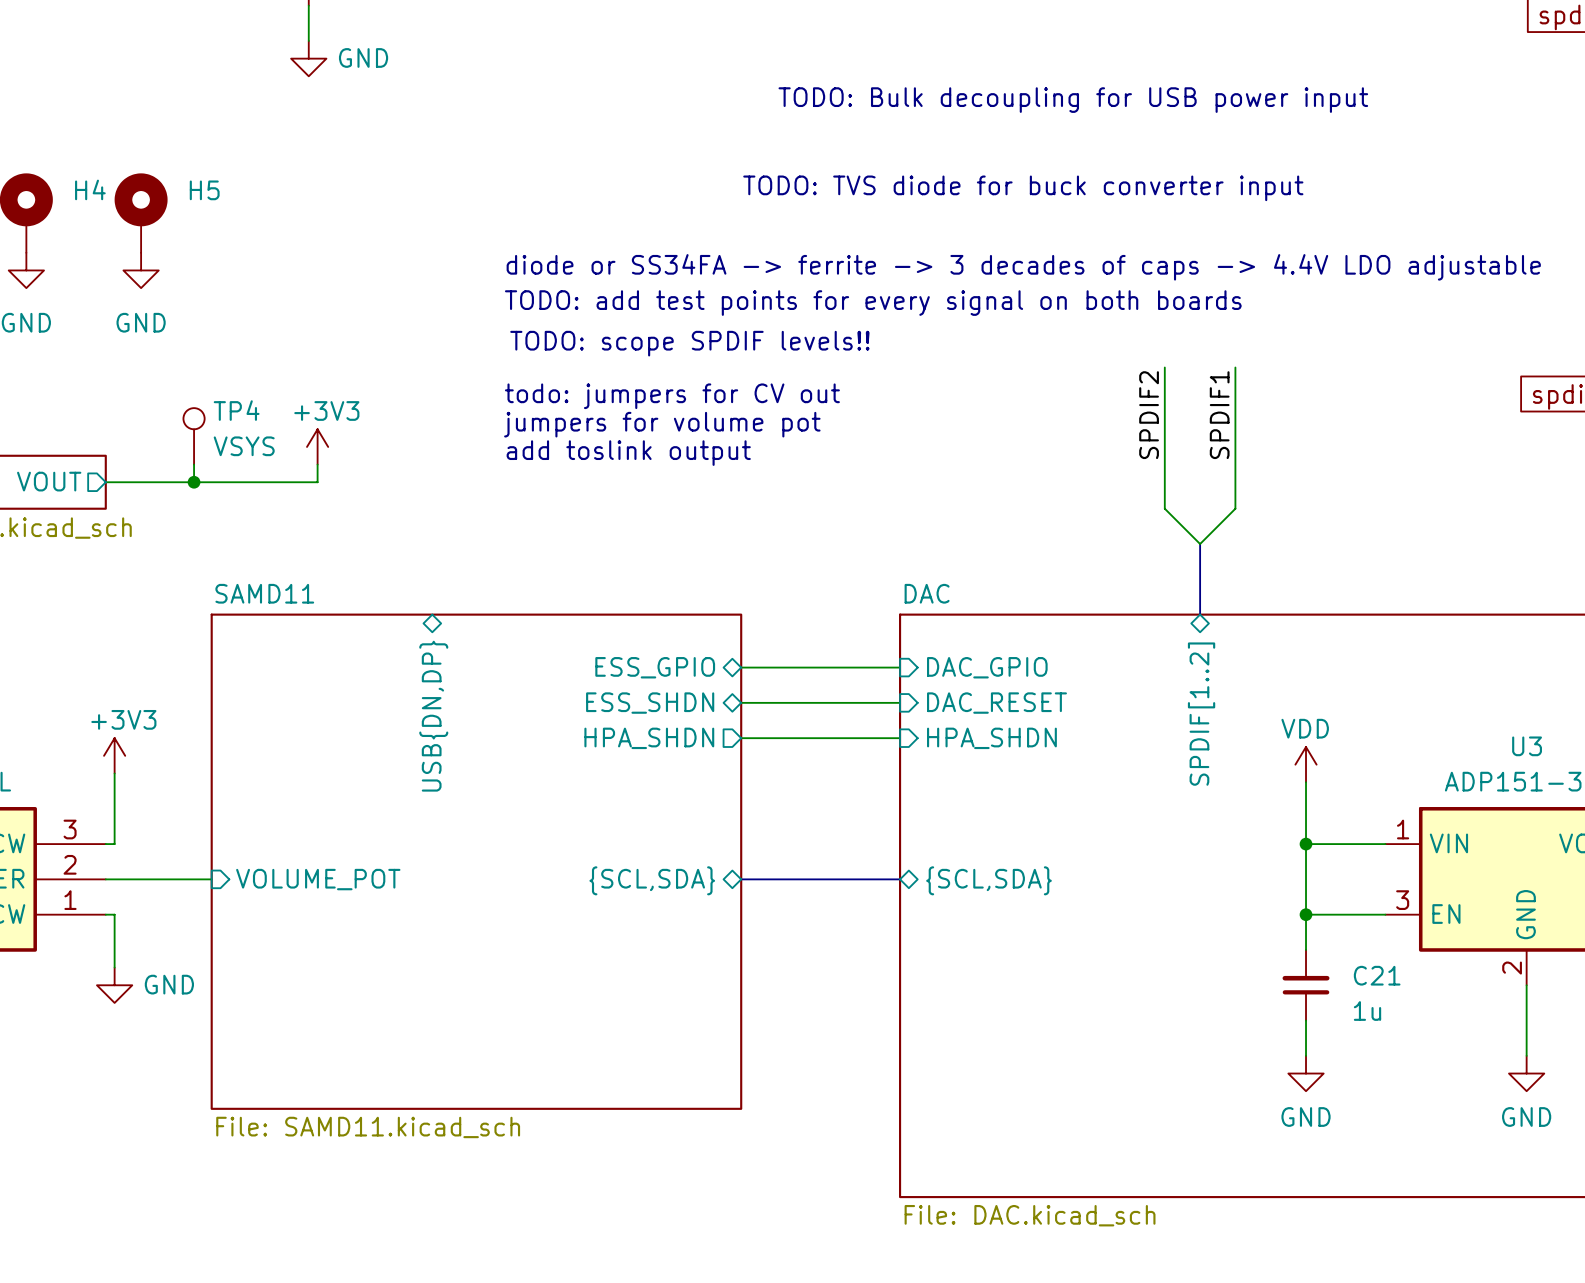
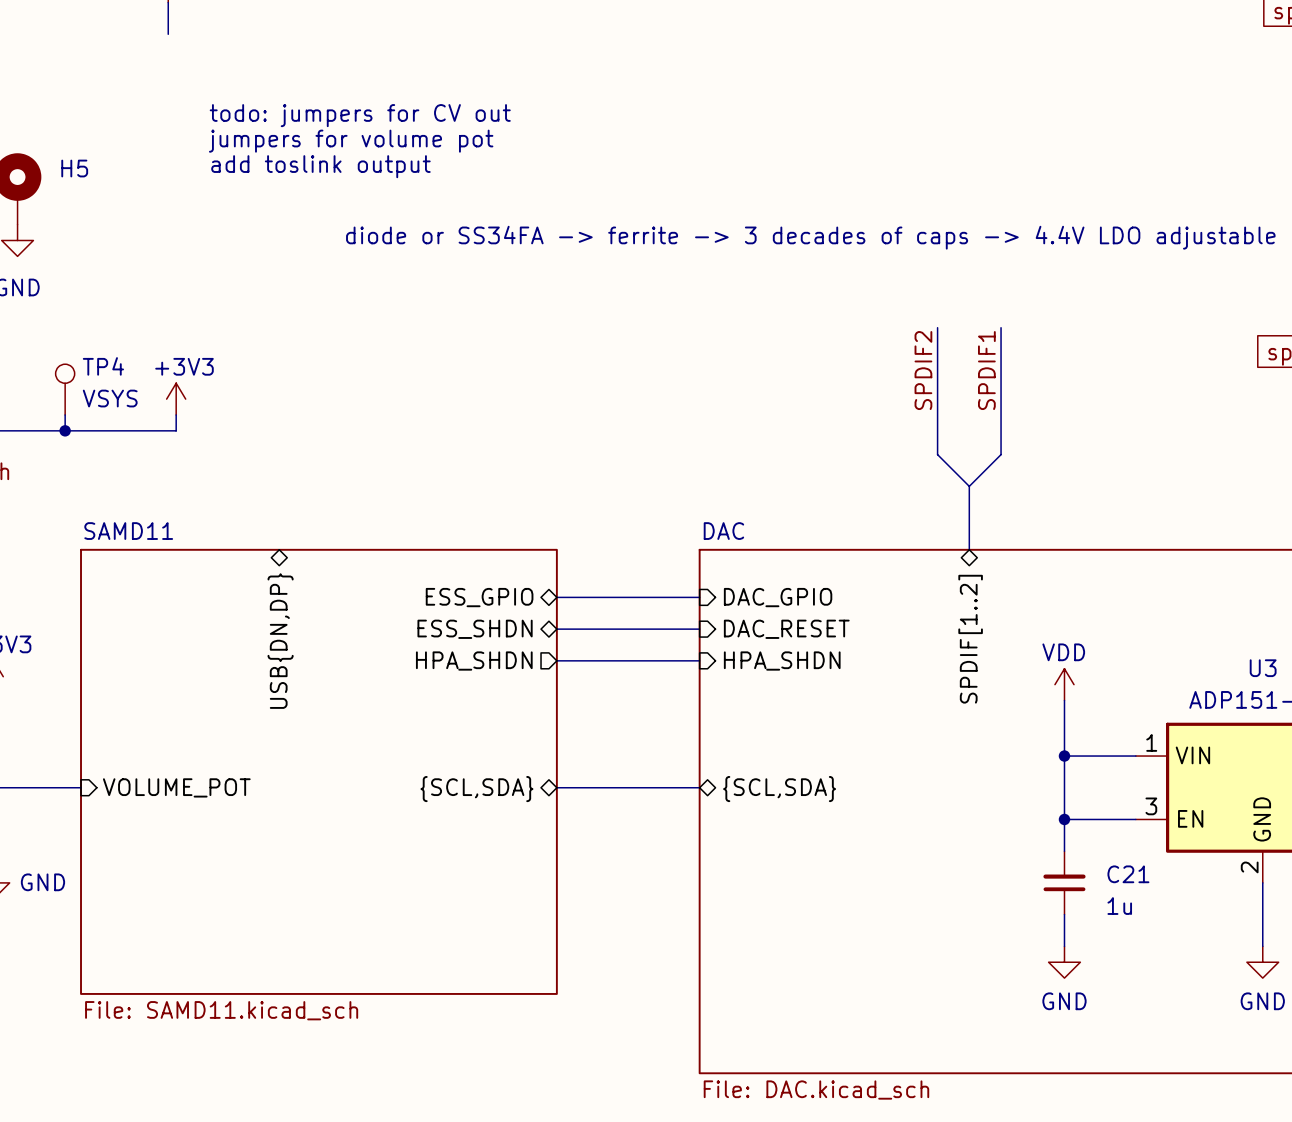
power symbol: GND (308, 58) -> none
text: TODO: Bulk decoupling for USB power input (1073, 100) -> none
text: TODO: TVS diode for buck converter input (1023, 188) -> none
text: TODO: add test points for every signal on both boards (873, 303) -> none
text: TODO: scope SPDIF levels!! (689, 343) -> none
text position: todo: jumpers for CV out (672, 396) -> todo: jumpers for CV out (360, 115)
text position: jumpers for volume pot (662, 424) -> jumpers for volume pot (351, 141)
text position: add toslink output (628, 453) -> add toslink output (320, 166)

